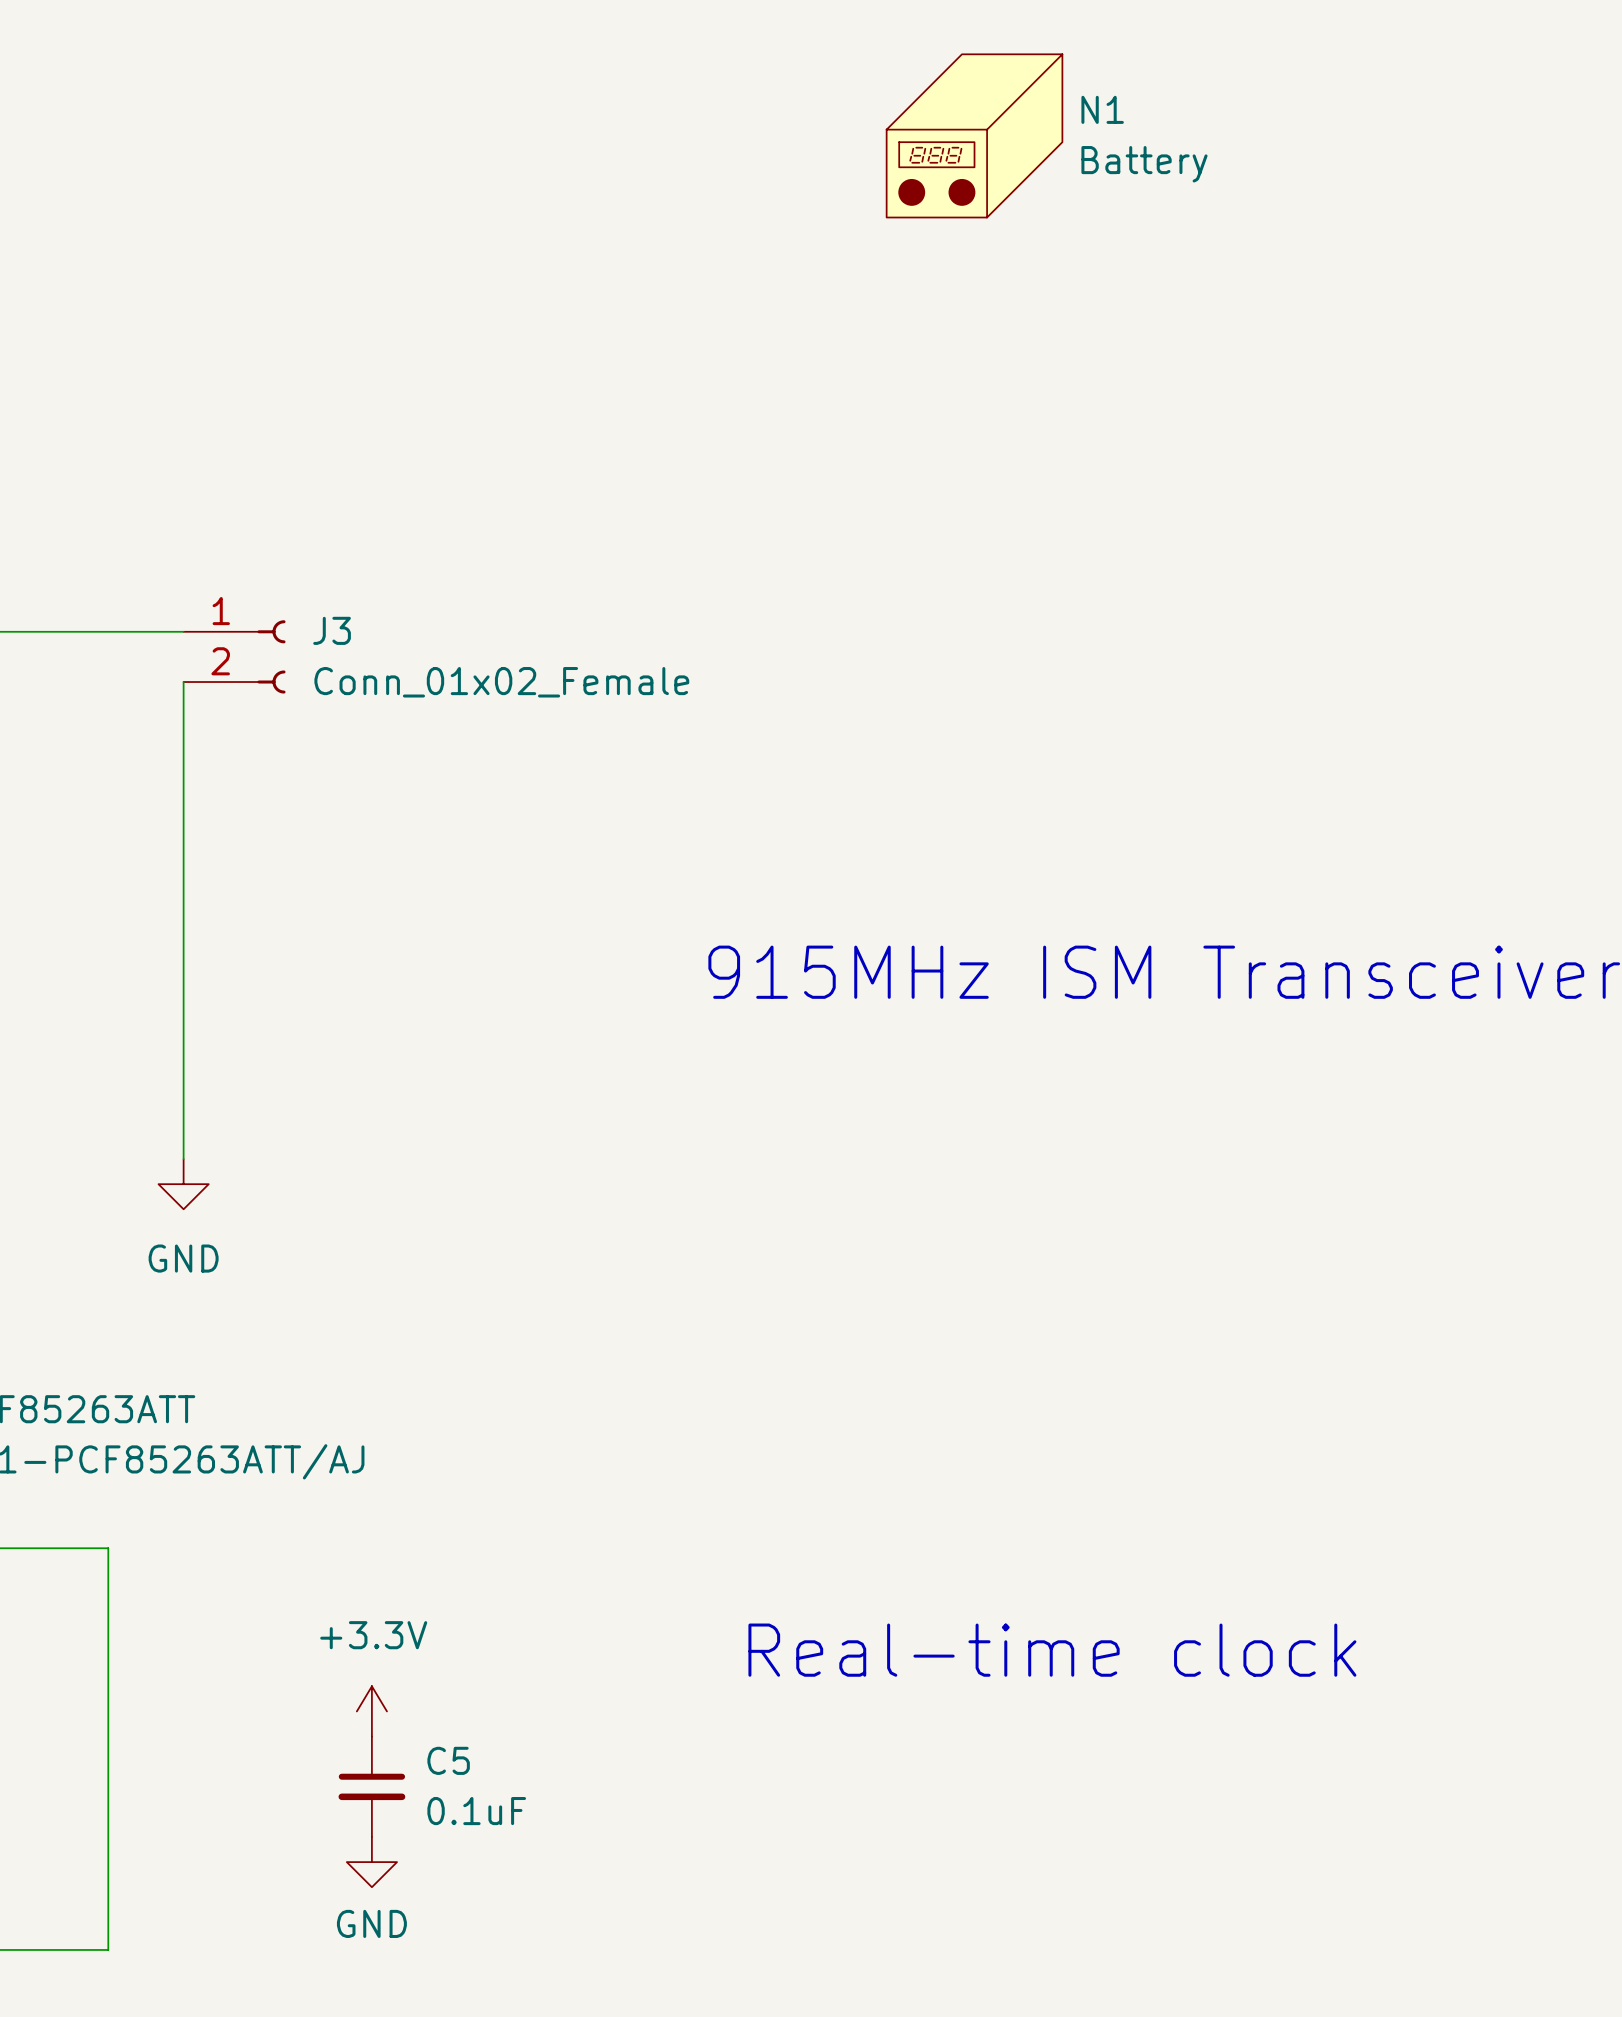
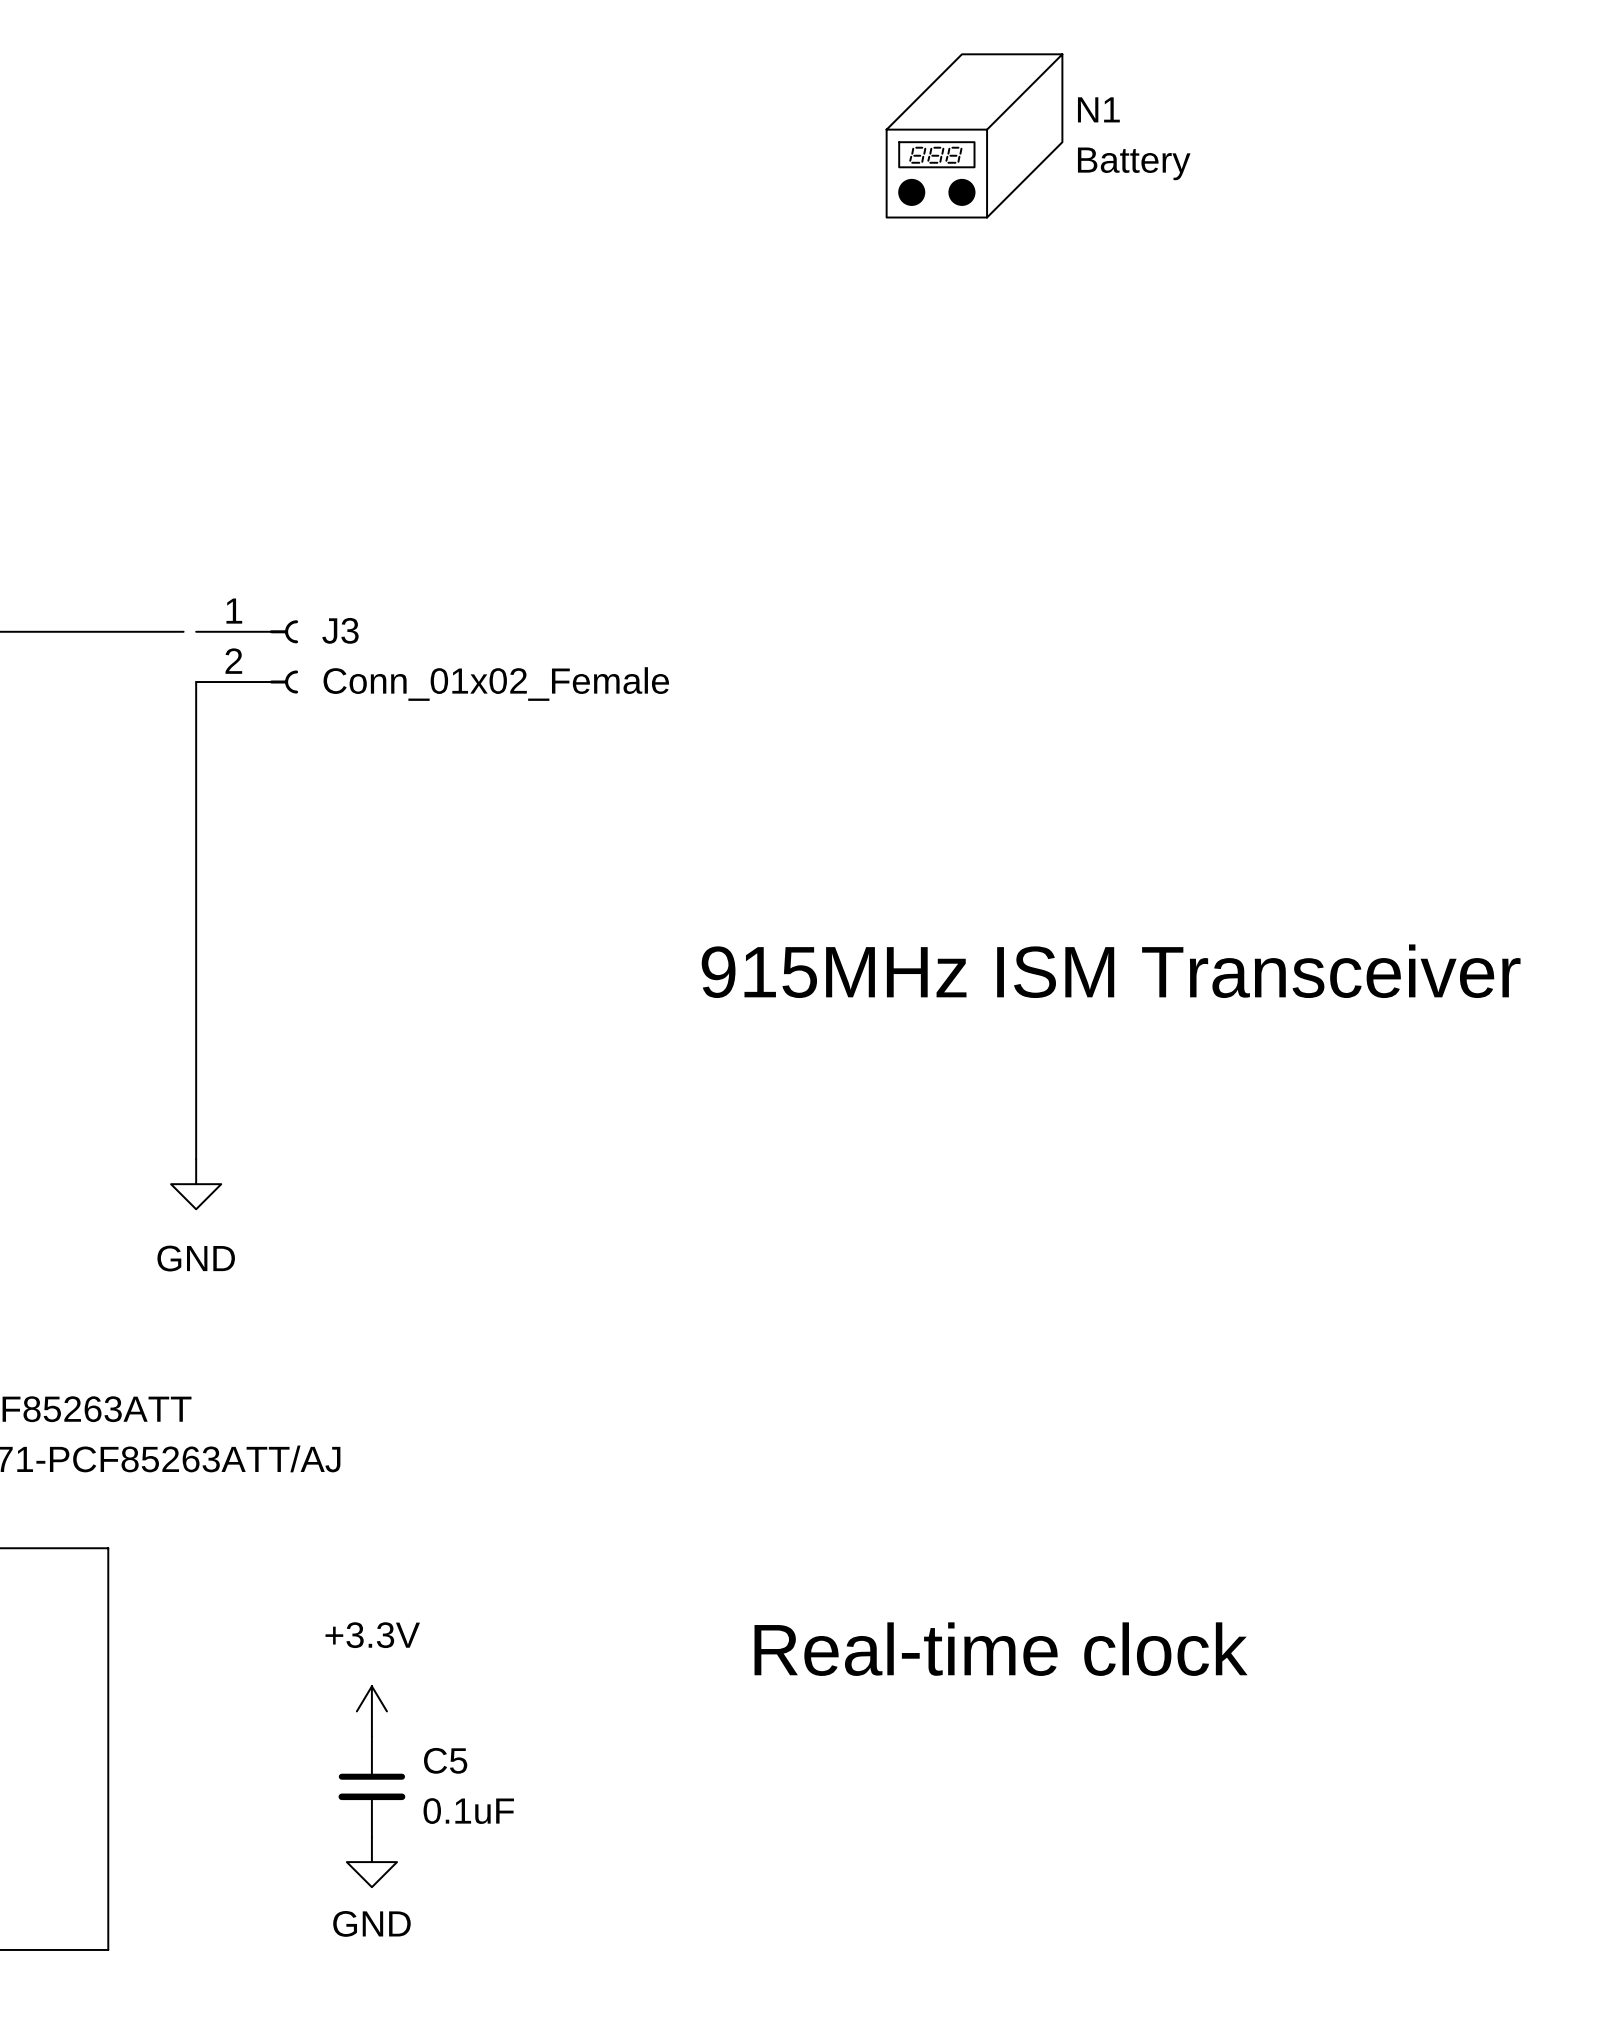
J3 position: (234, 656) -> (247, 656)
wire: (183, 682) (183, 1159) -> (196, 682) (196, 1159)
power symbol position: GND (183, 1184) -> GND (196, 1184)
text position: Real-time clock (1052, 1650) -> Real-time clock (1001, 1649)

